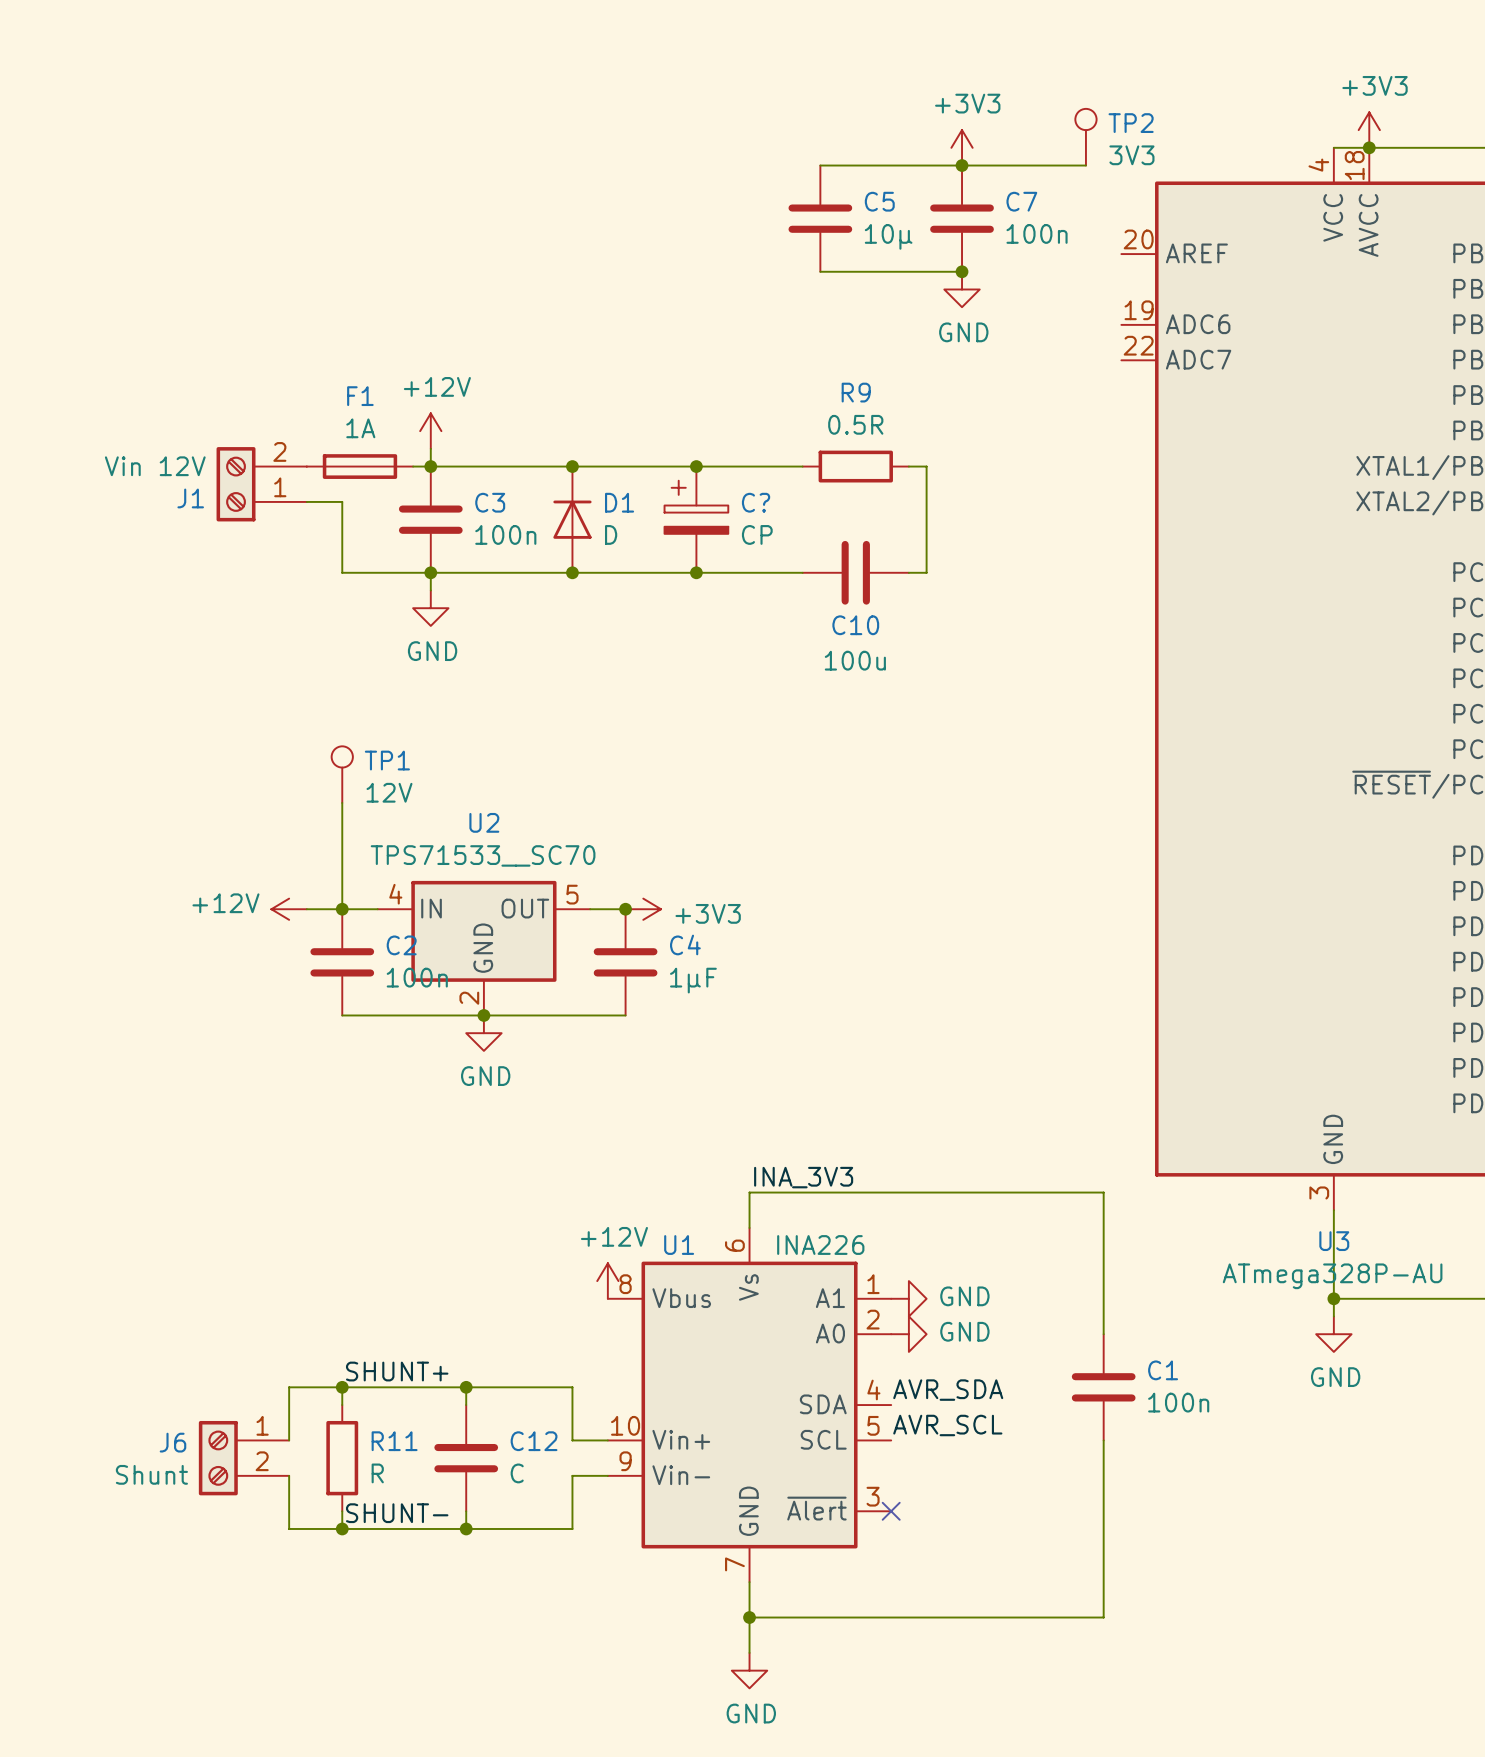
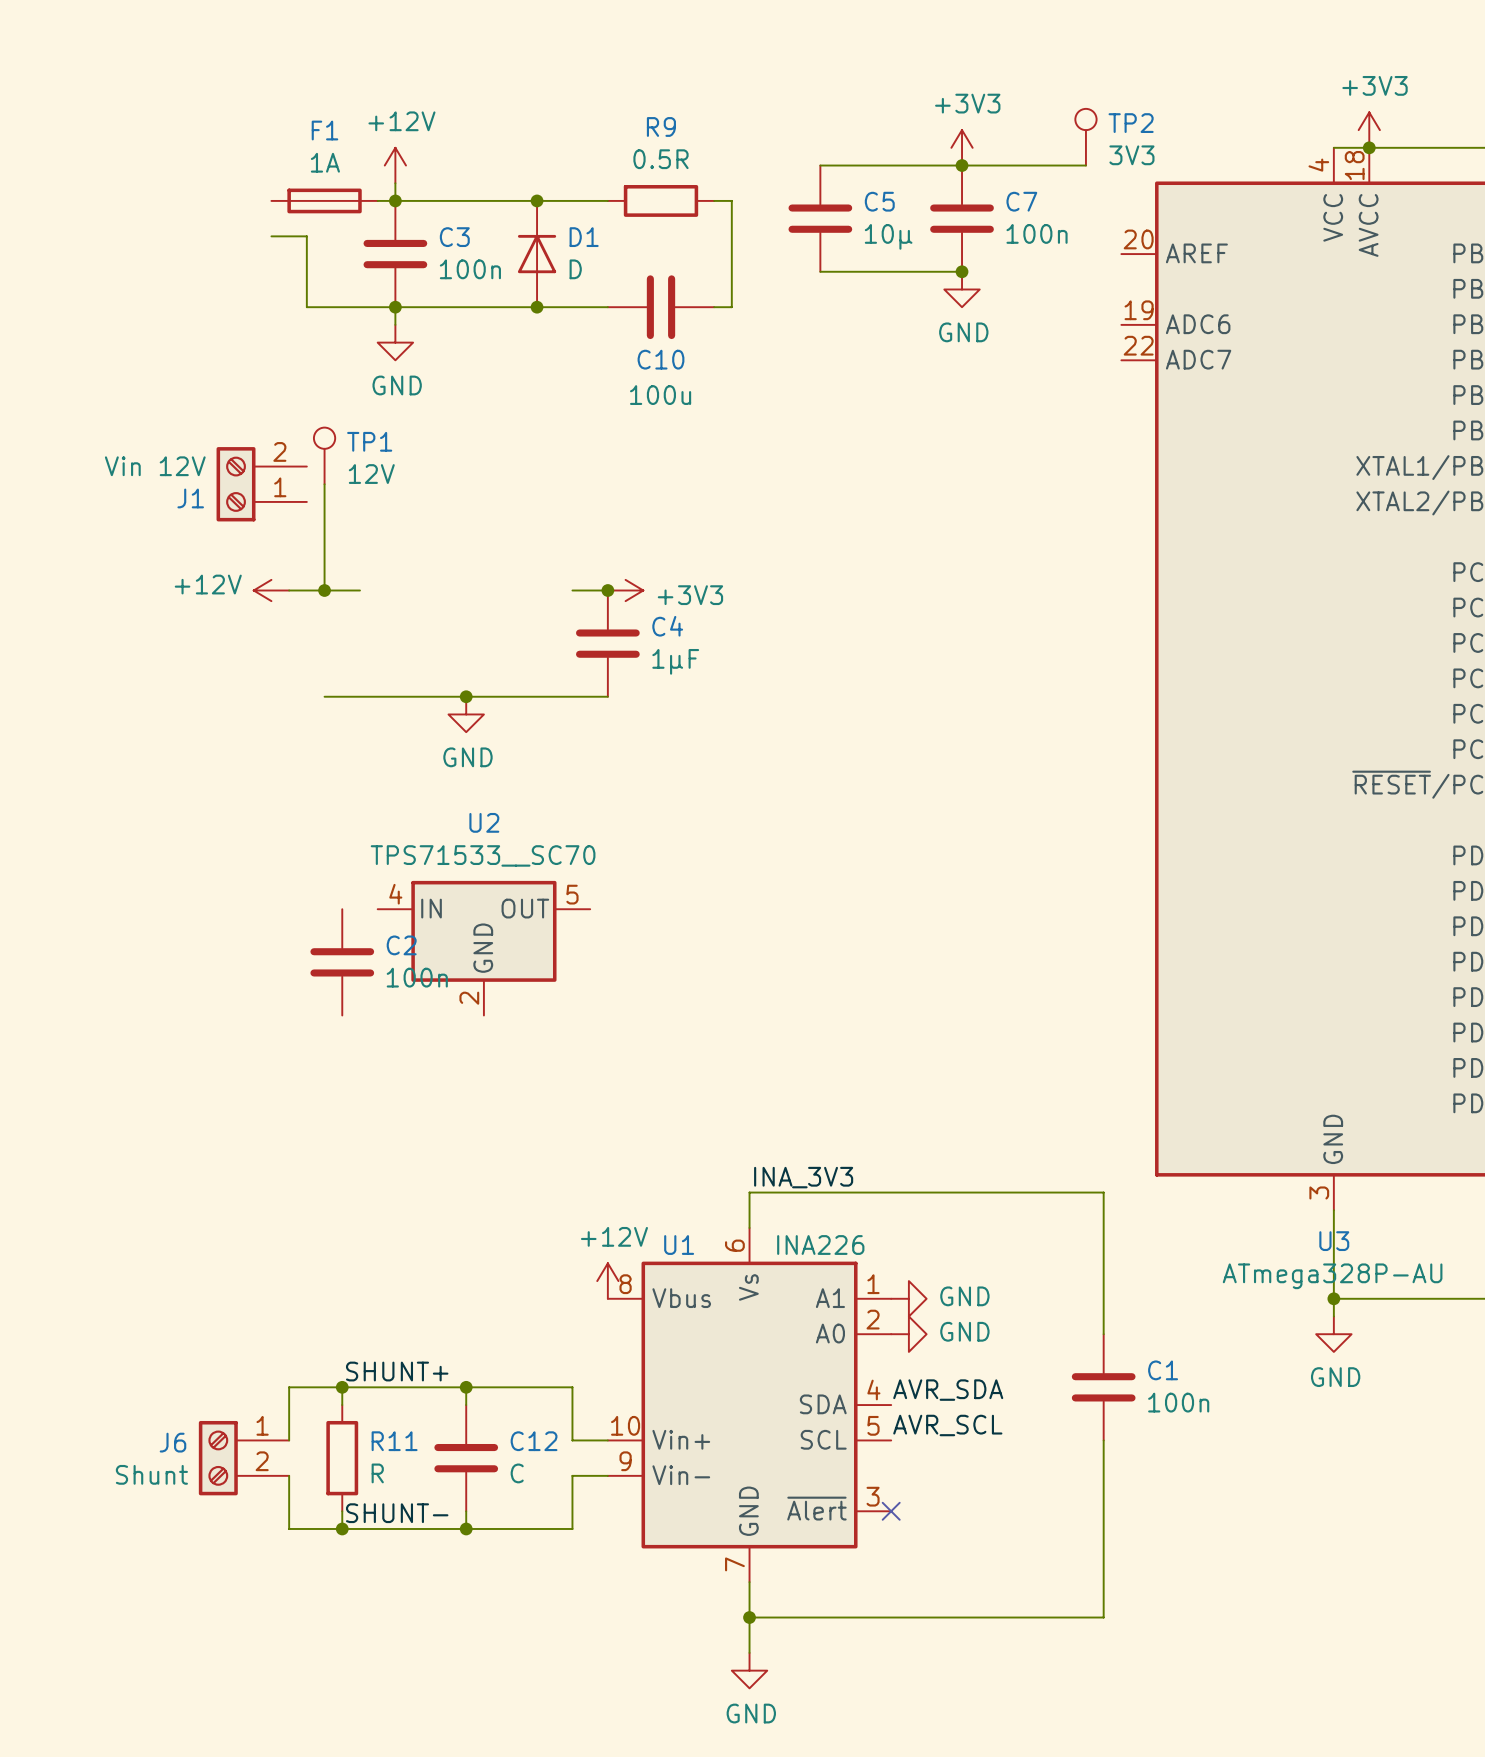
power symbol: none -> +12V (395, 165)
wire: none -> (377, 200) (607, 200)
junction: none -> (395, 200)
junction: none -> (537, 200)
wire: none -> (271, 236) (306, 236) (306, 307) (607, 307)
junction: none -> (395, 307)
junction: none -> (537, 307)
power symbol: none -> GND (395, 342)
power symbol: +12V (430, 431) -> none
wire: (430, 448) (430, 466) -> (395, 183) (395, 200)
F1 position: (359, 466) -> (324, 200)
wire: (413, 466) (802, 466) -> none
junction: (430, 466) -> none
junction: (572, 466) -> none
junction: (696, 466) -> none
R9 position: (855, 466) -> (660, 200)
wire: (908, 466) (926, 466) (926, 572) (908, 572) -> (714, 200) (731, 200) (731, 307) (714, 307)
wire: (306, 501) (342, 501) (342, 572) (802, 572) -> none
C3 position: (430, 519) -> (395, 254)
D1 position: (572, 519) -> (537, 254)
C?: CP (696, 519) -> none
wire: (430, 572) (430, 590) -> (395, 307) (395, 324)
junction: (430, 572) -> none
junction position: (572, 572) -> (607, 590)
junction: (696, 572) -> none
C10 position: (855, 572) -> (660, 307)
power symbol: none -> +12V (271, 590)
junction: none -> (324, 590)
power symbol position: GND (430, 608) -> GND (466, 714)
junction: none -> (466, 696)
TP1 position: (342, 774) -> (324, 455)
wire: (342, 802) (342, 909) -> (324, 484) (324, 590)
power symbol: +12V (289, 909) -> none
wire: (306, 909) (377, 909) -> (289, 590) (359, 590)
junction: (342, 909) -> none
wire: (590, 909) (625, 909) -> (572, 590) (607, 590)
junction: (625, 909) -> none
power symbol position: +3V3 (643, 909) -> +3V3 (625, 590)
C4 position: (625, 962) -> (607, 643)
wire: (342, 1015) (625, 1015) -> (324, 696) (607, 696)
junction: (483, 1015) -> none
power symbol: GND (483, 1033) -> none

